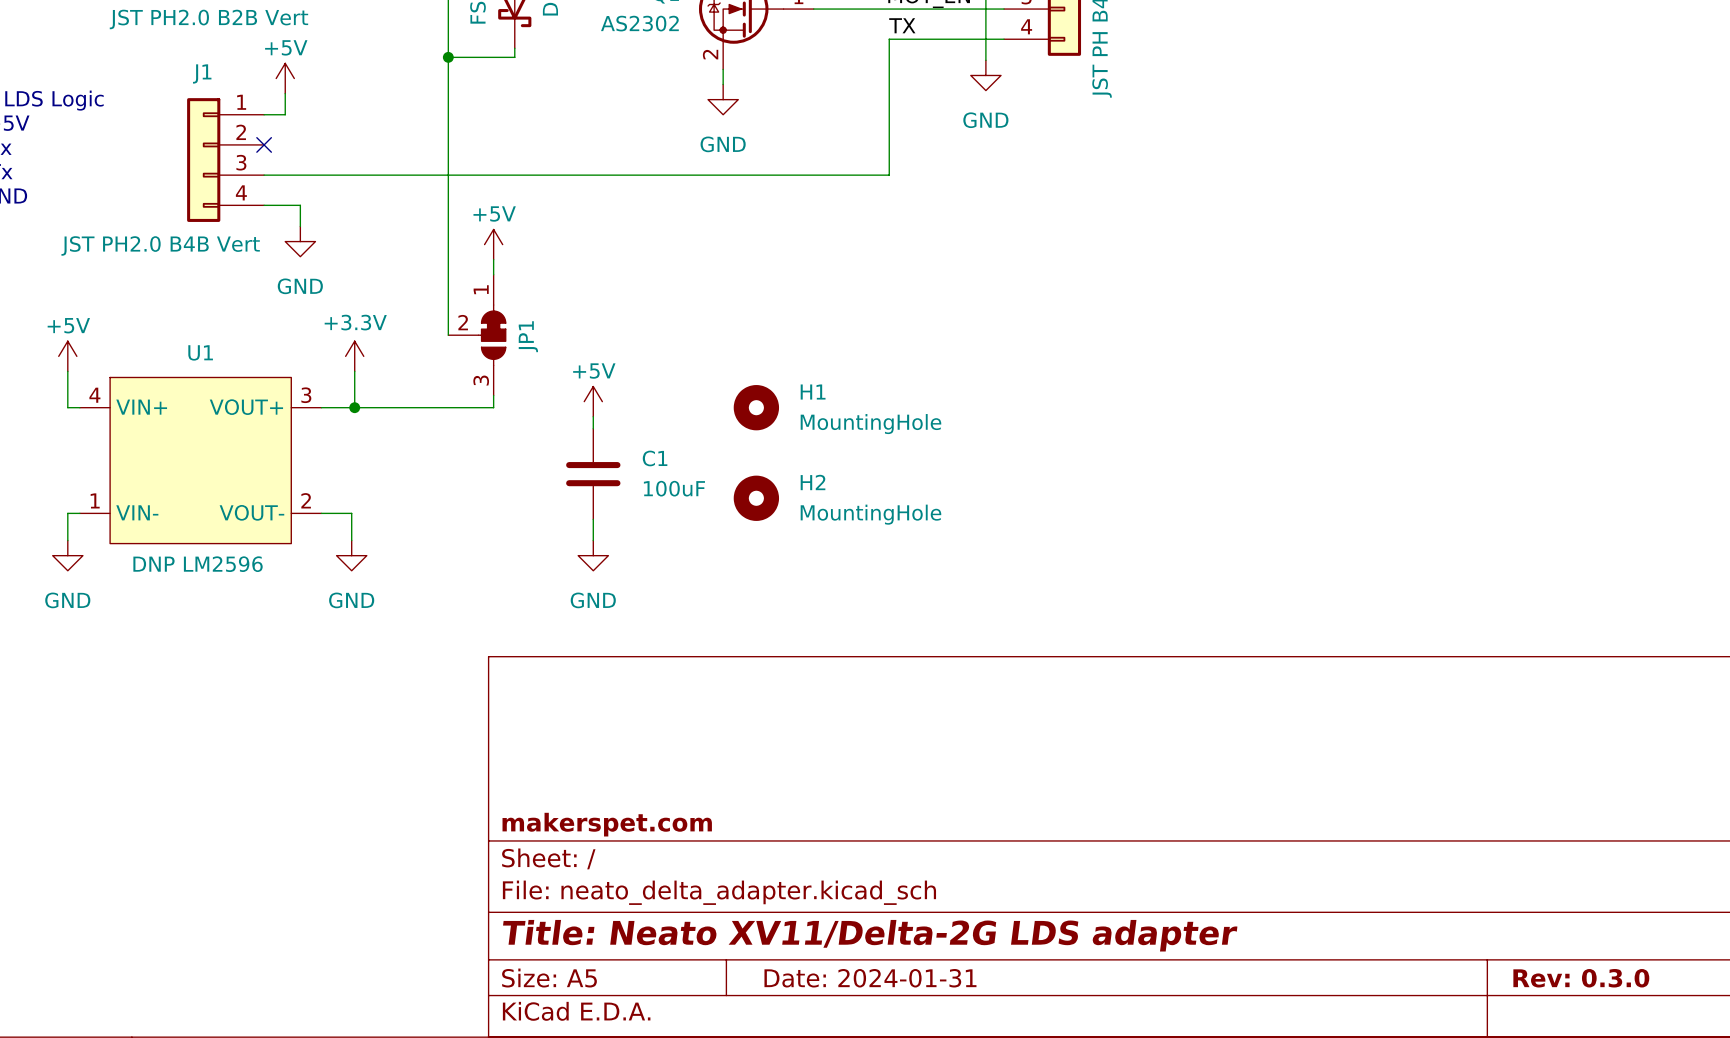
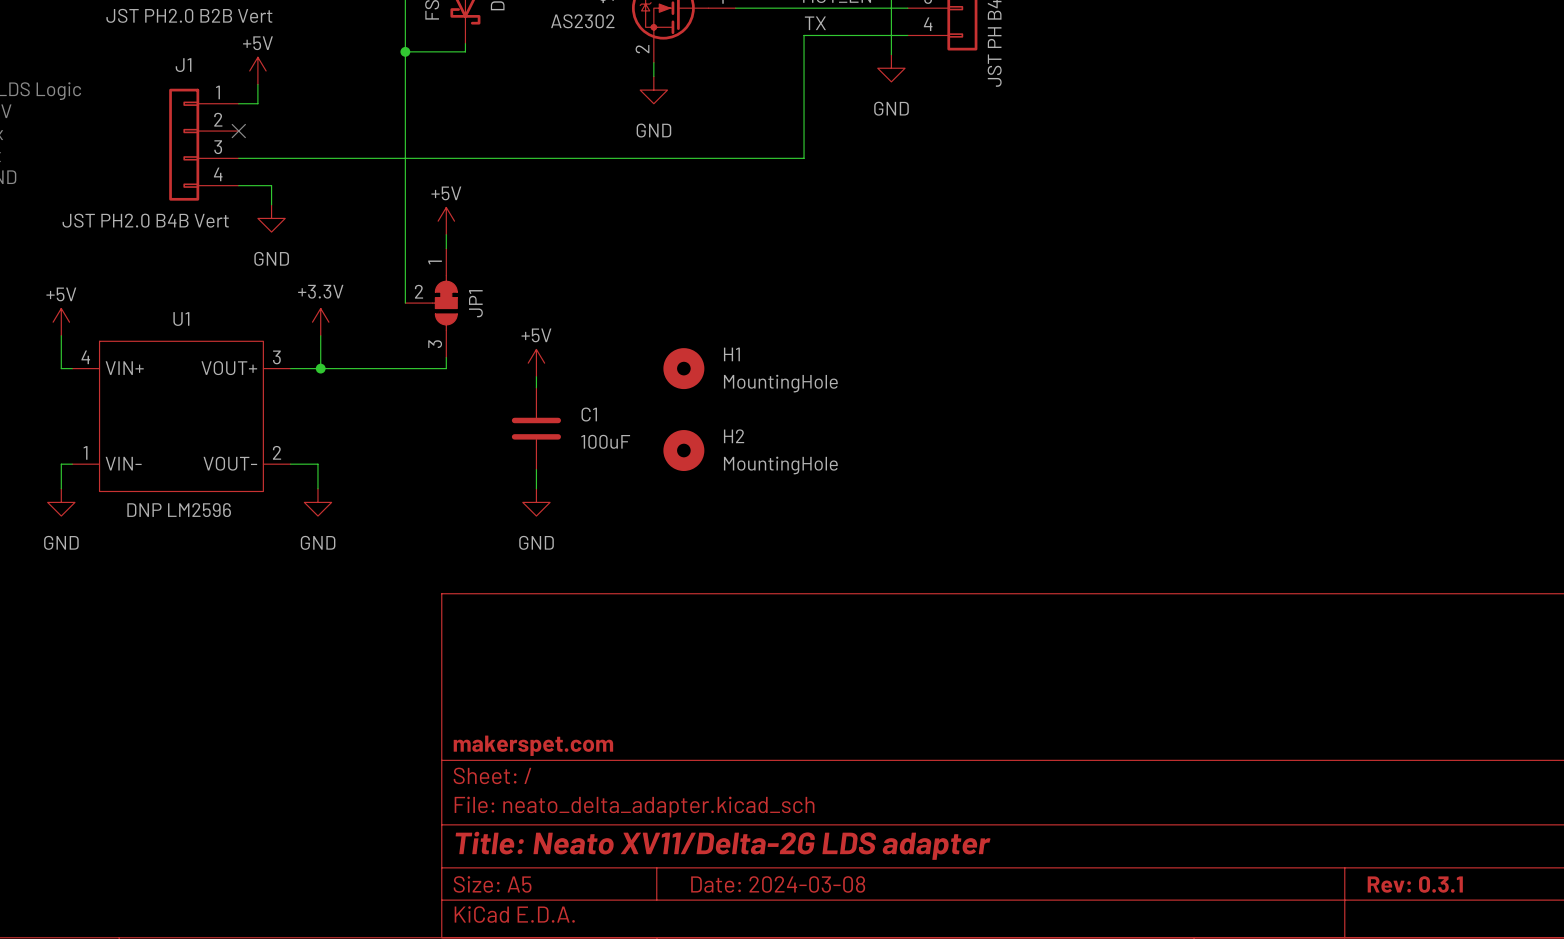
title block: Date: 2024-01-31 (870, 978) -> Date: 2024-03-08 (778, 884)
title block: Rev: 0.3.0 (1581, 978) -> Rev: 0.3.1 (1415, 884)

